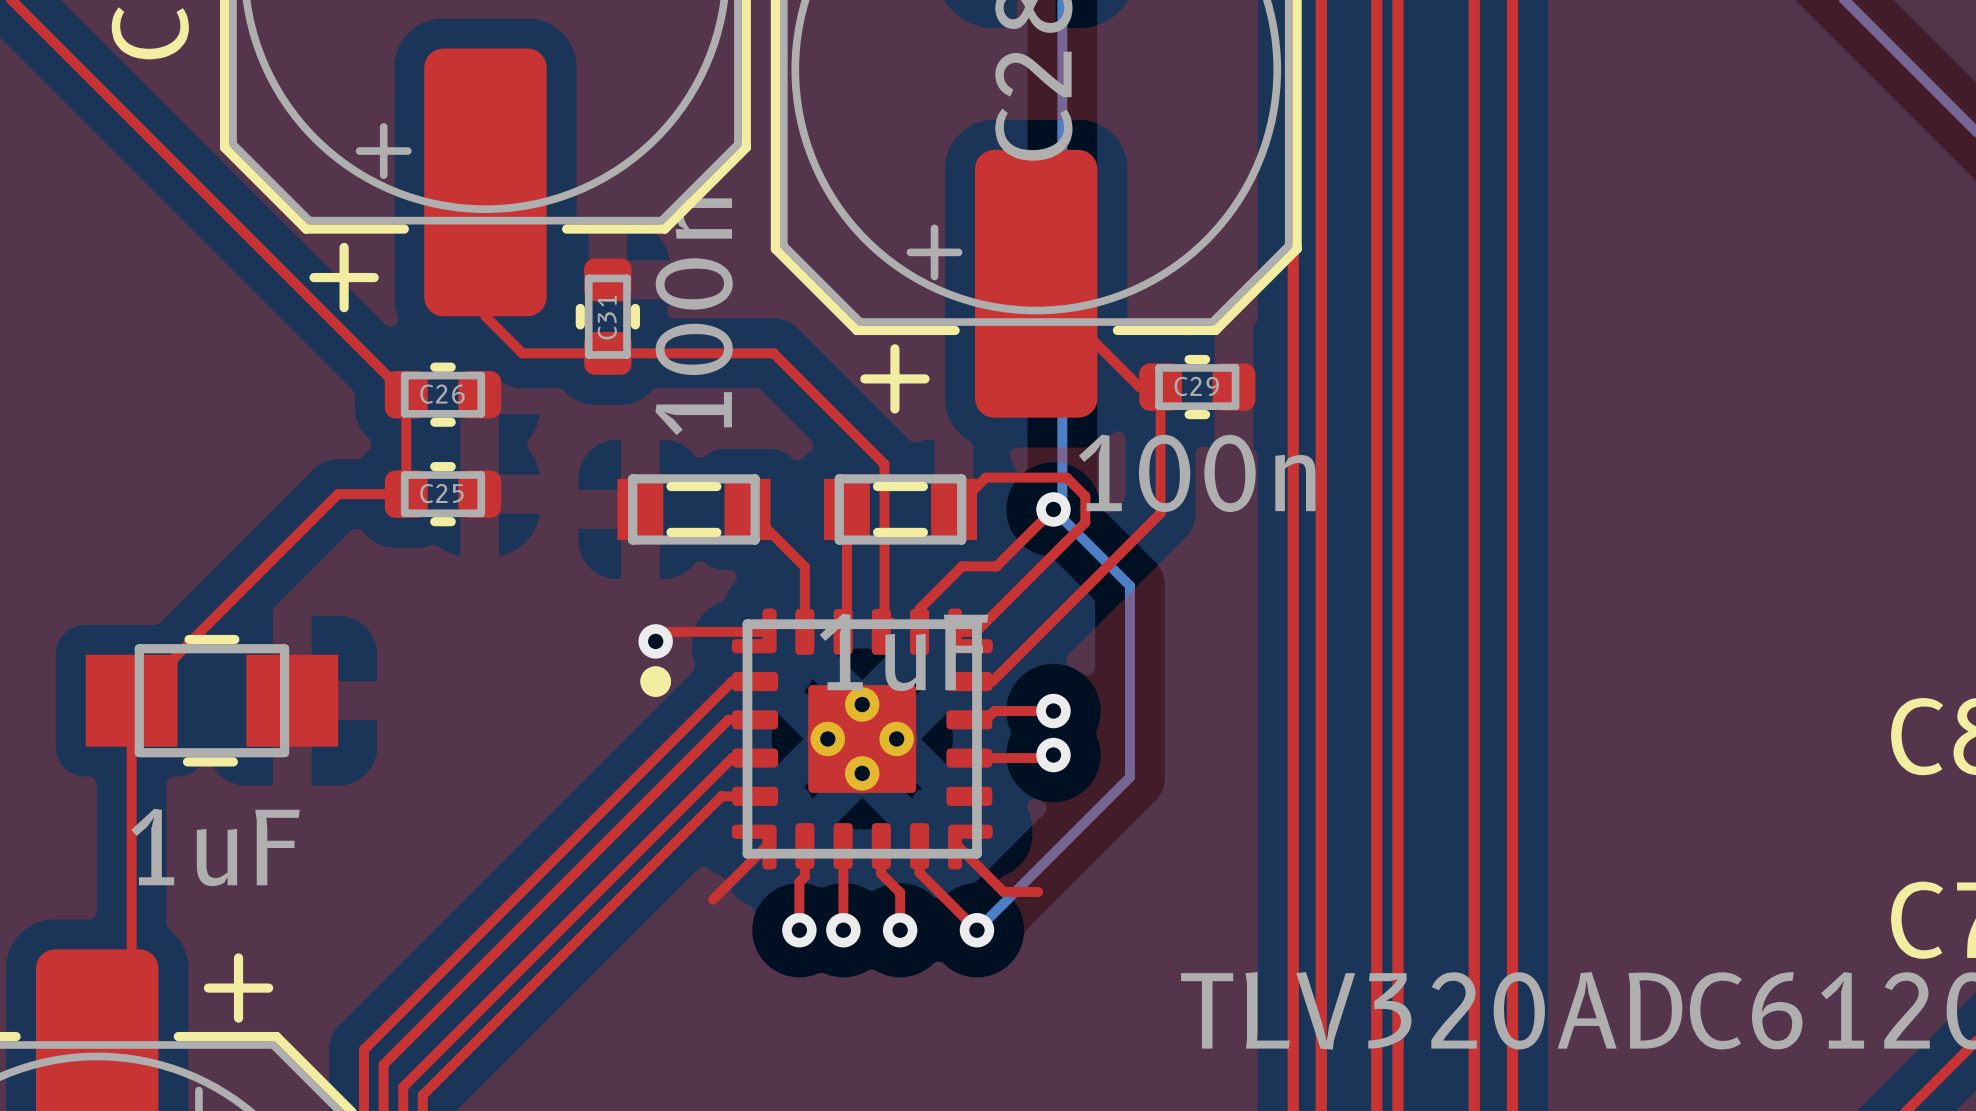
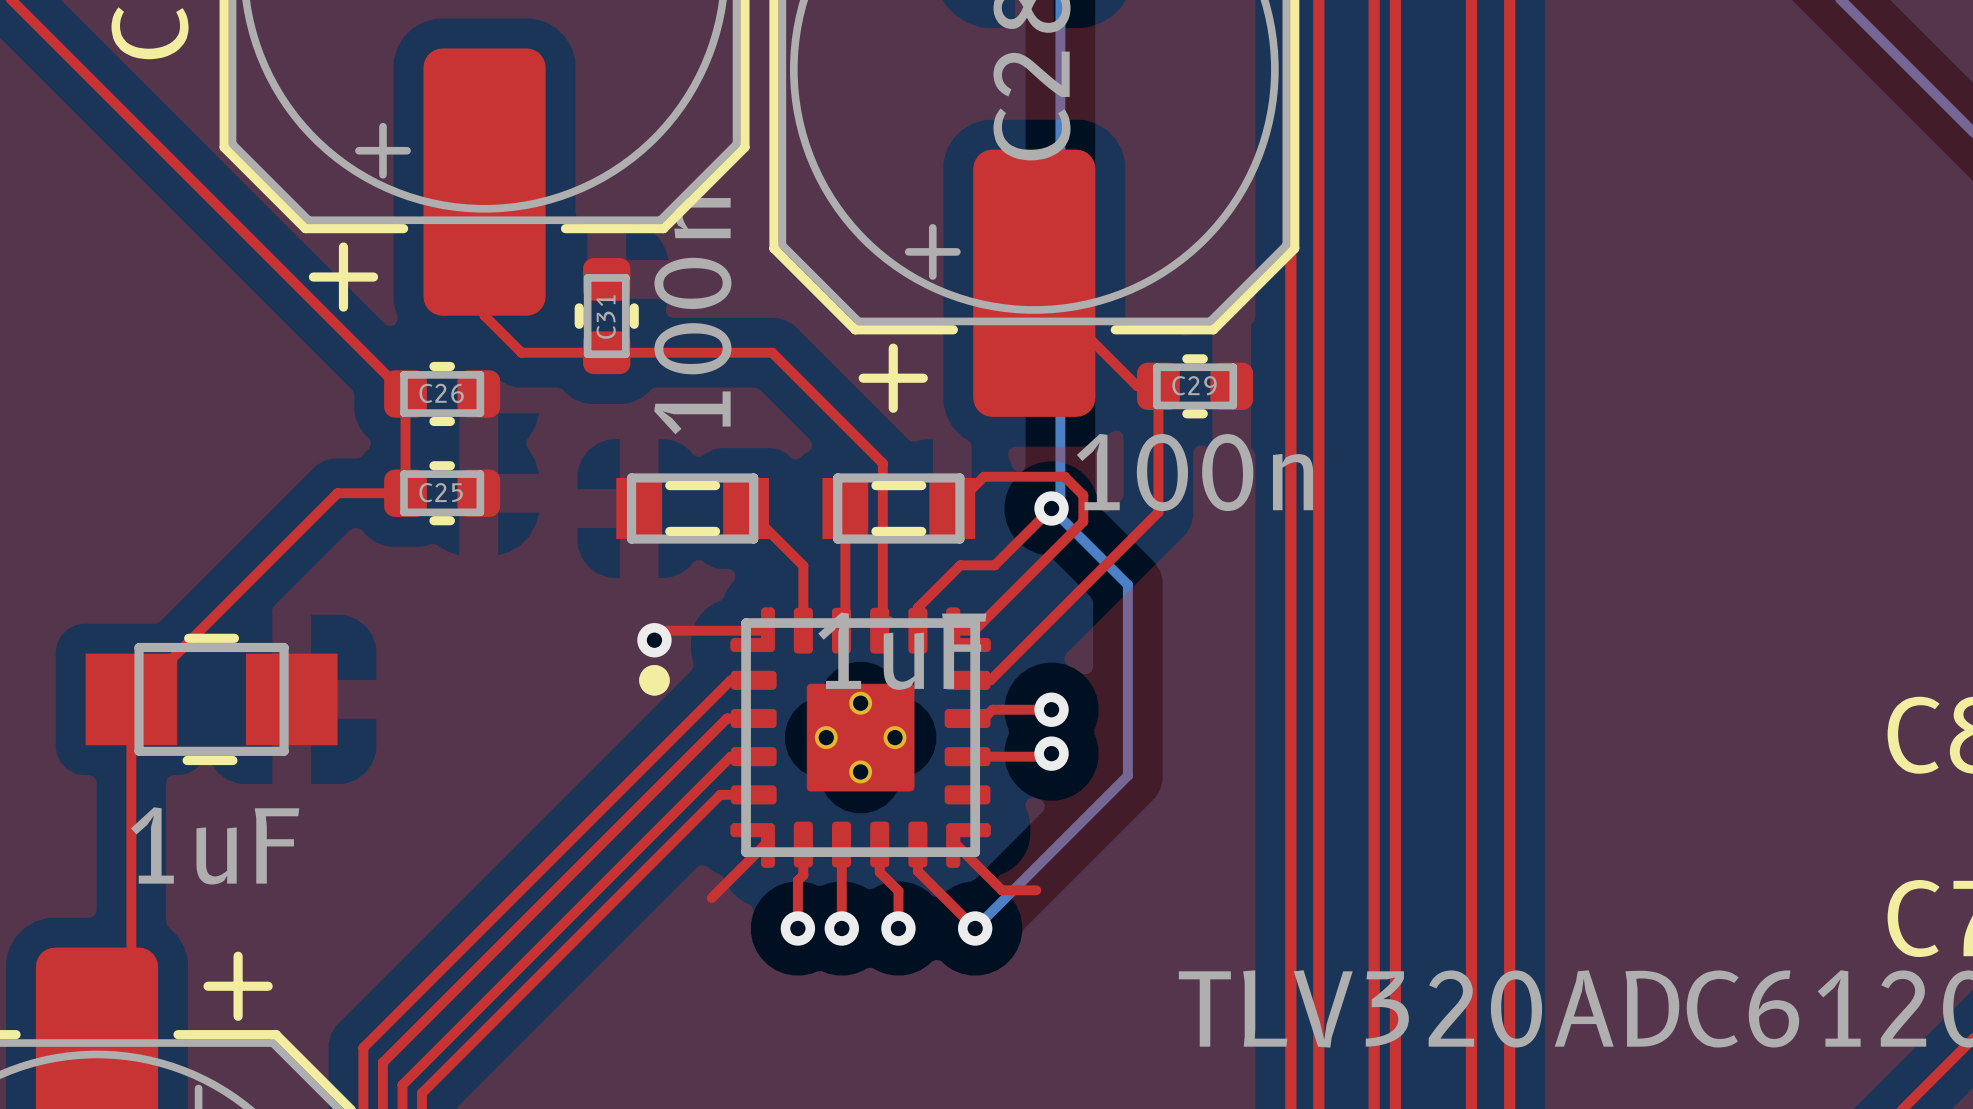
part footprint: [640, 608, 993, 870] -> [639, 607, 991, 868]

